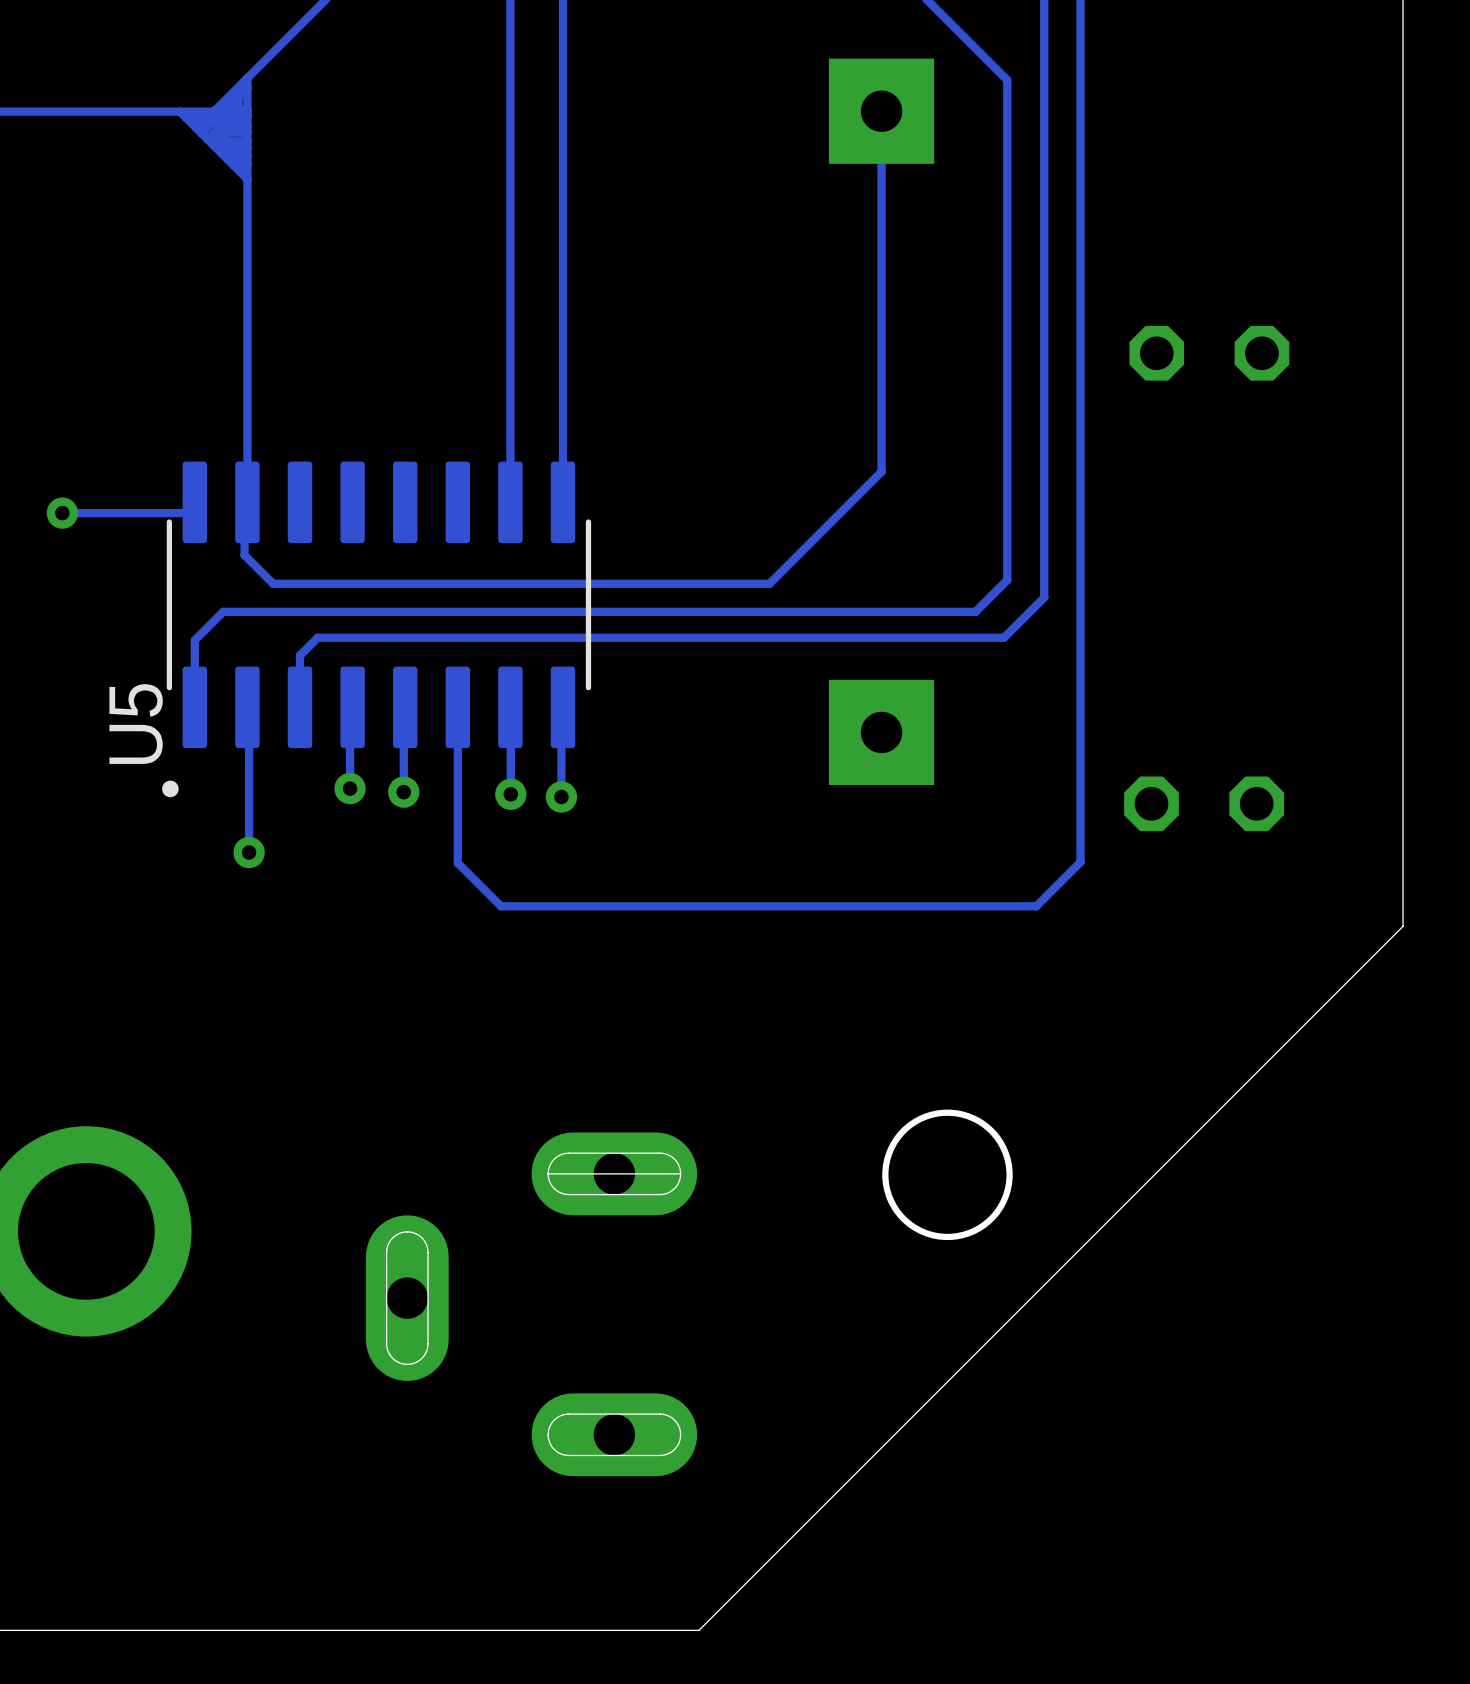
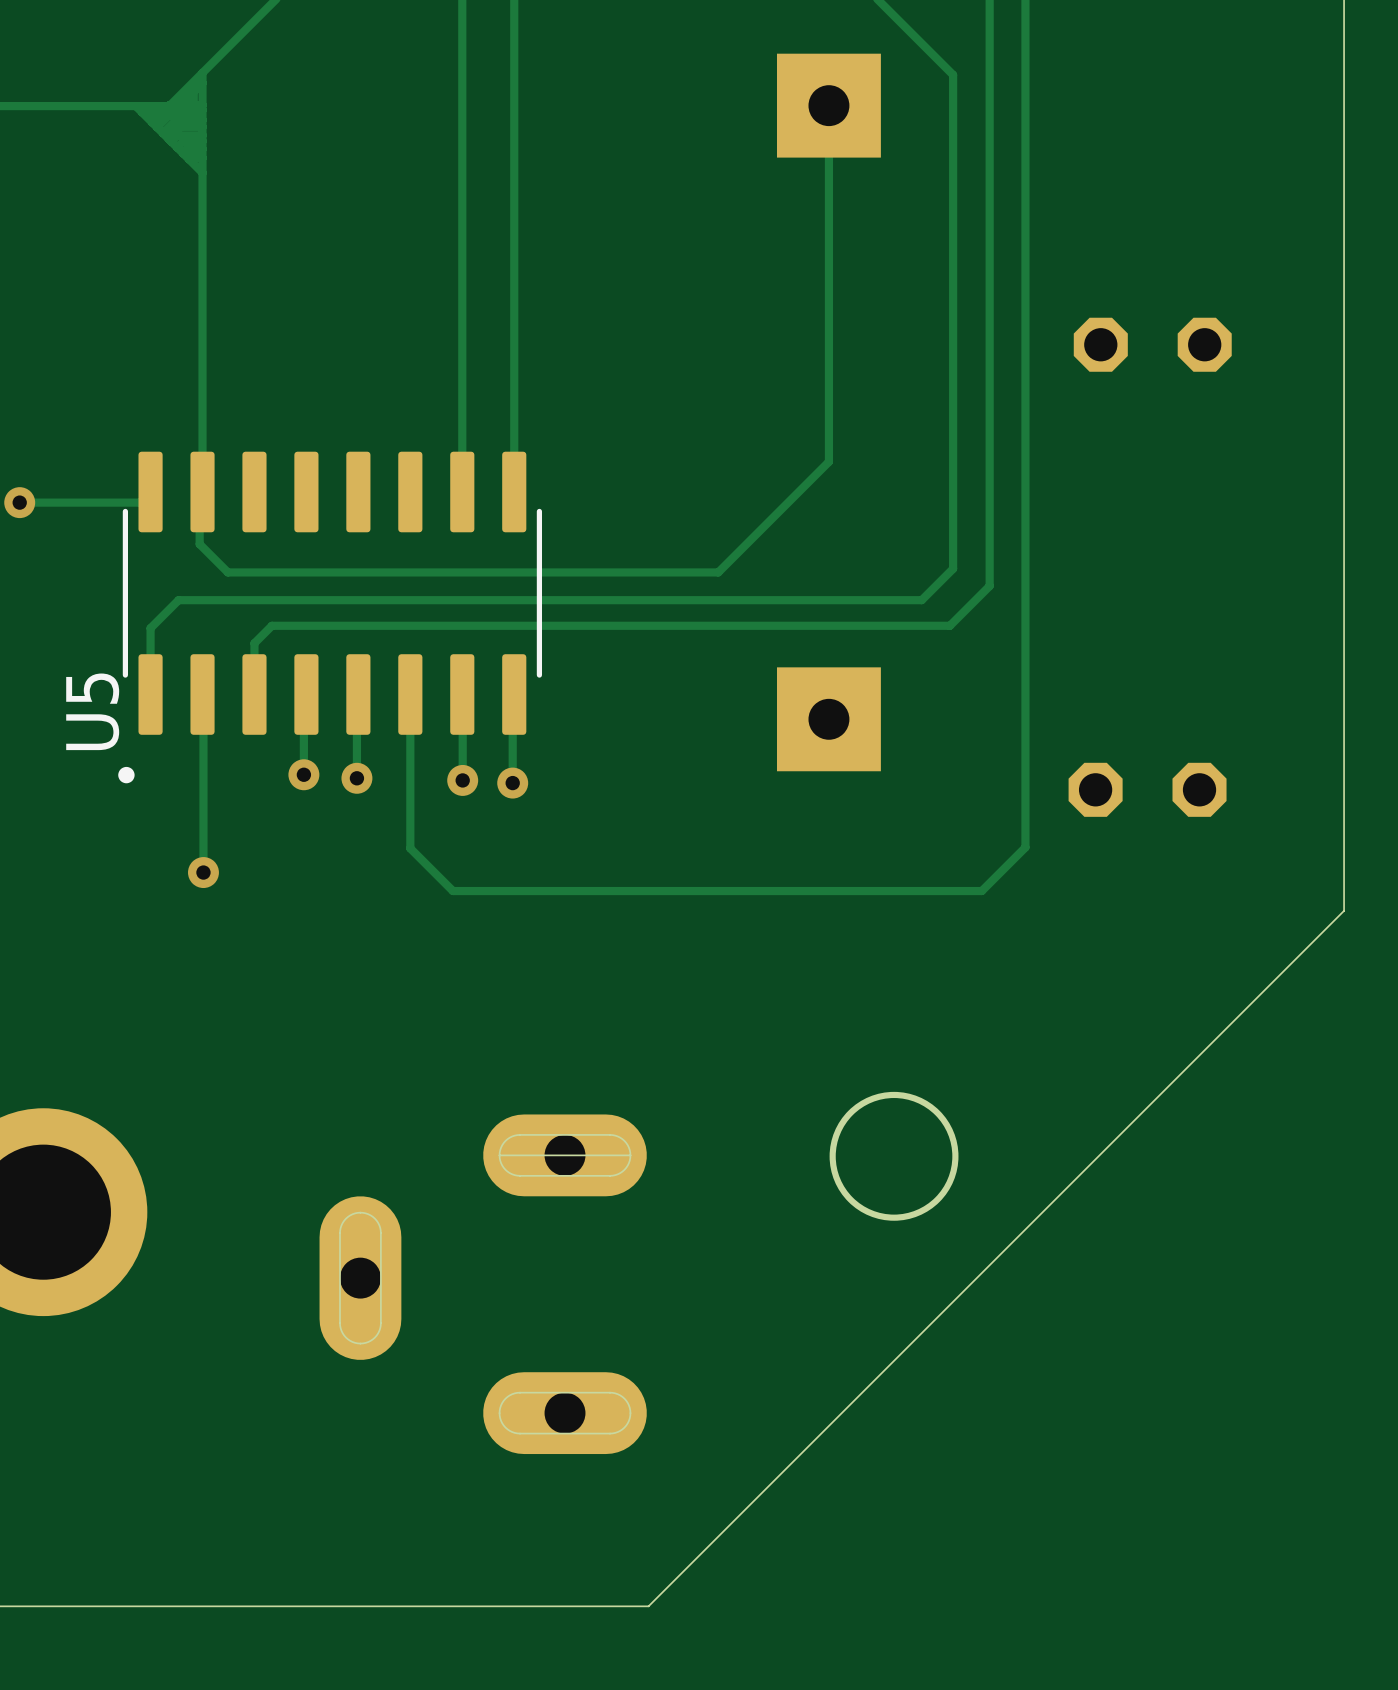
track: (248, 708) (249, 852) -> (203, 695) (203, 872)
via position: (249, 852) -> (203, 872)

